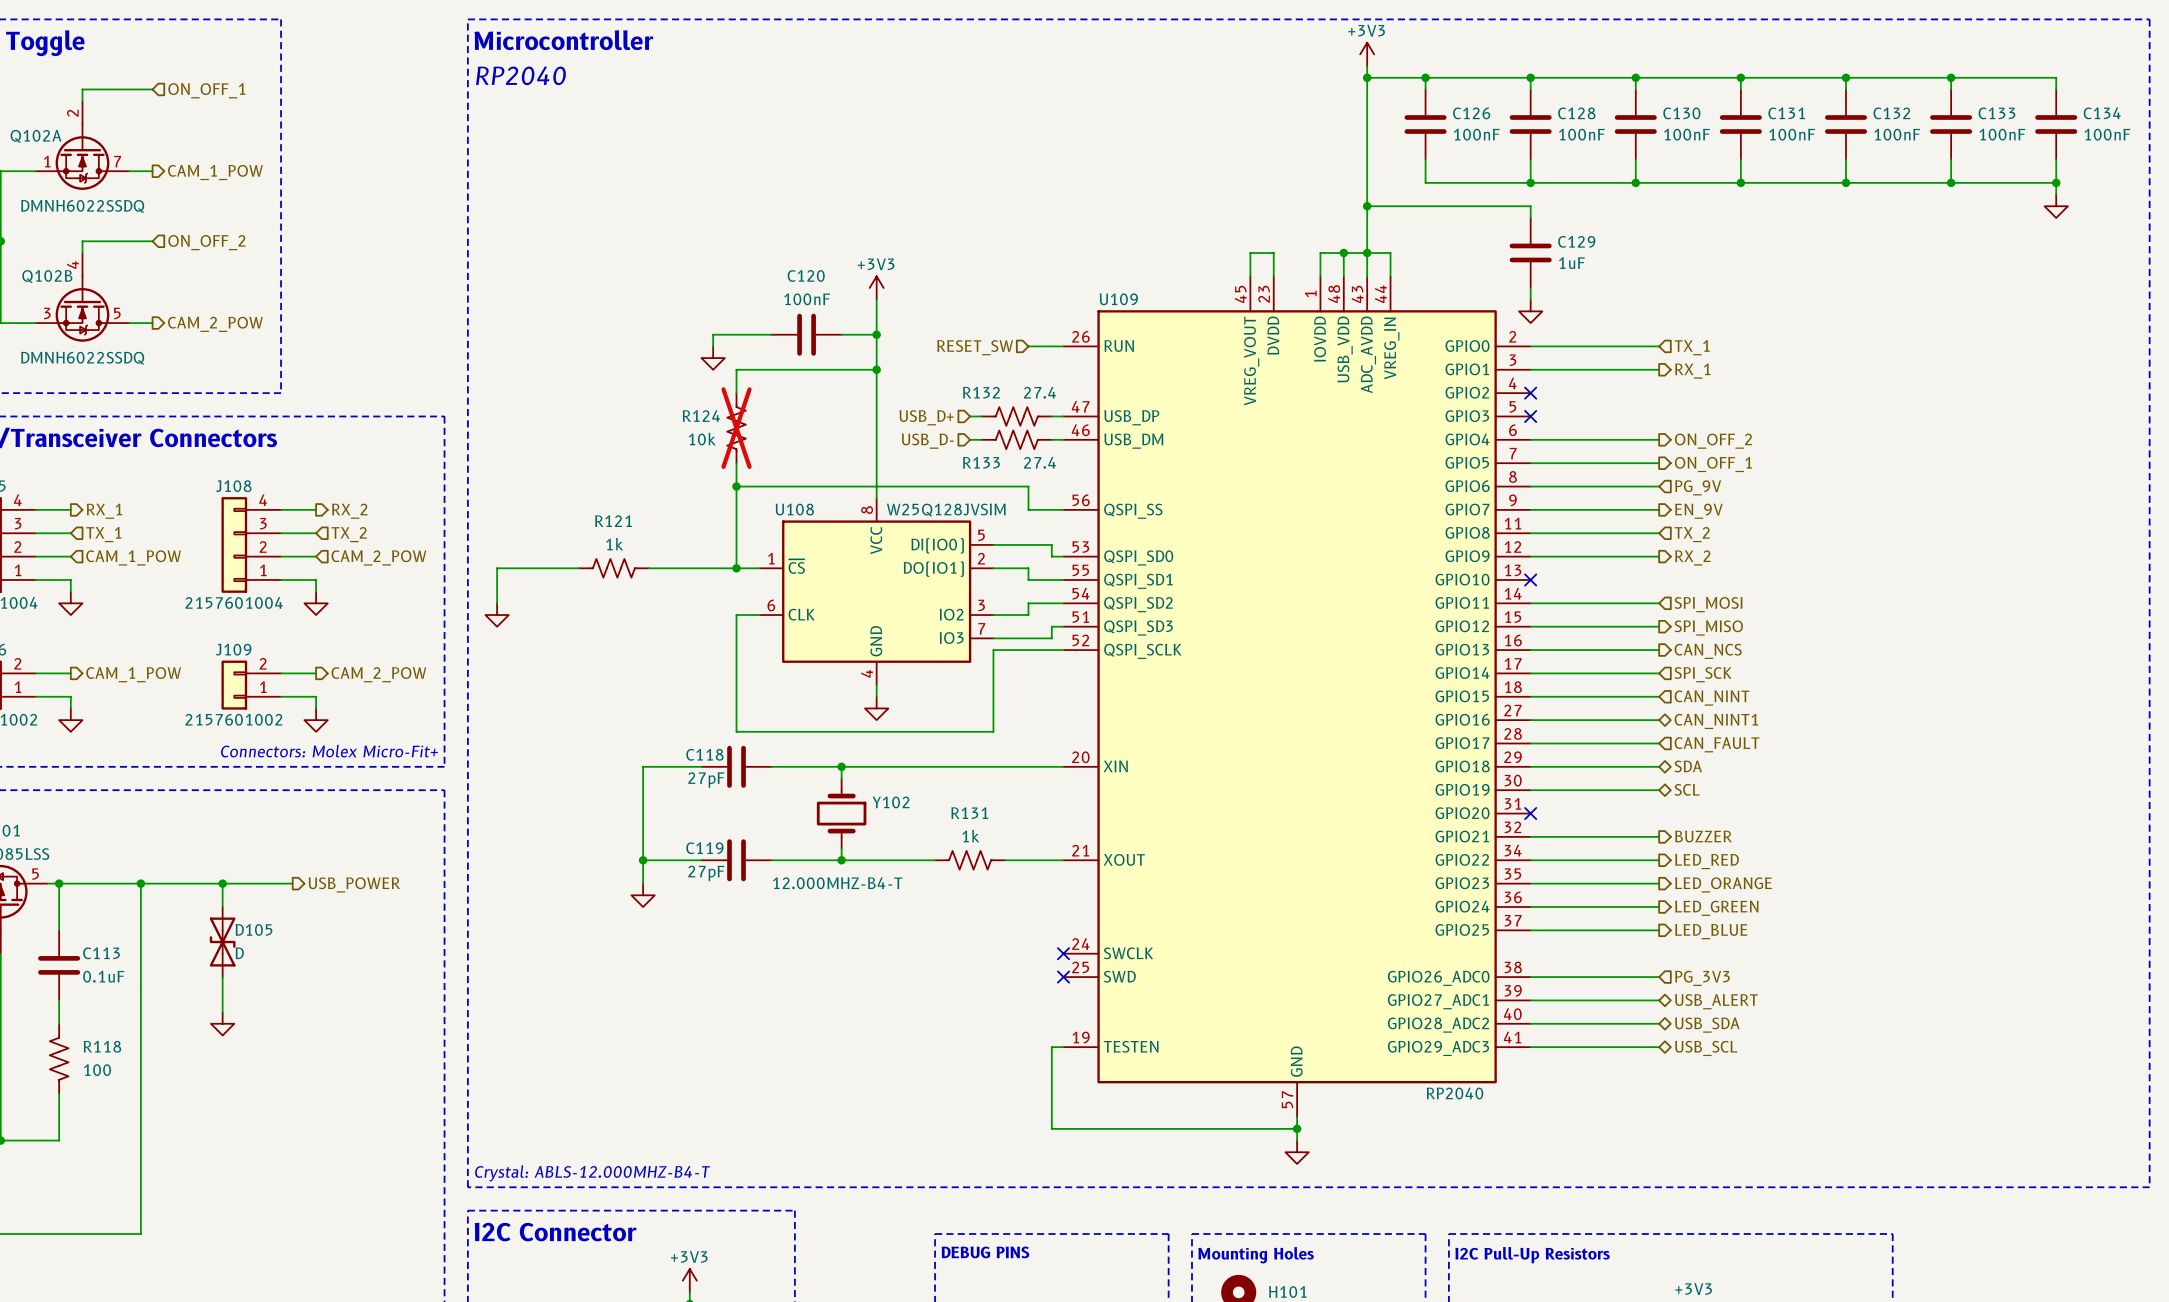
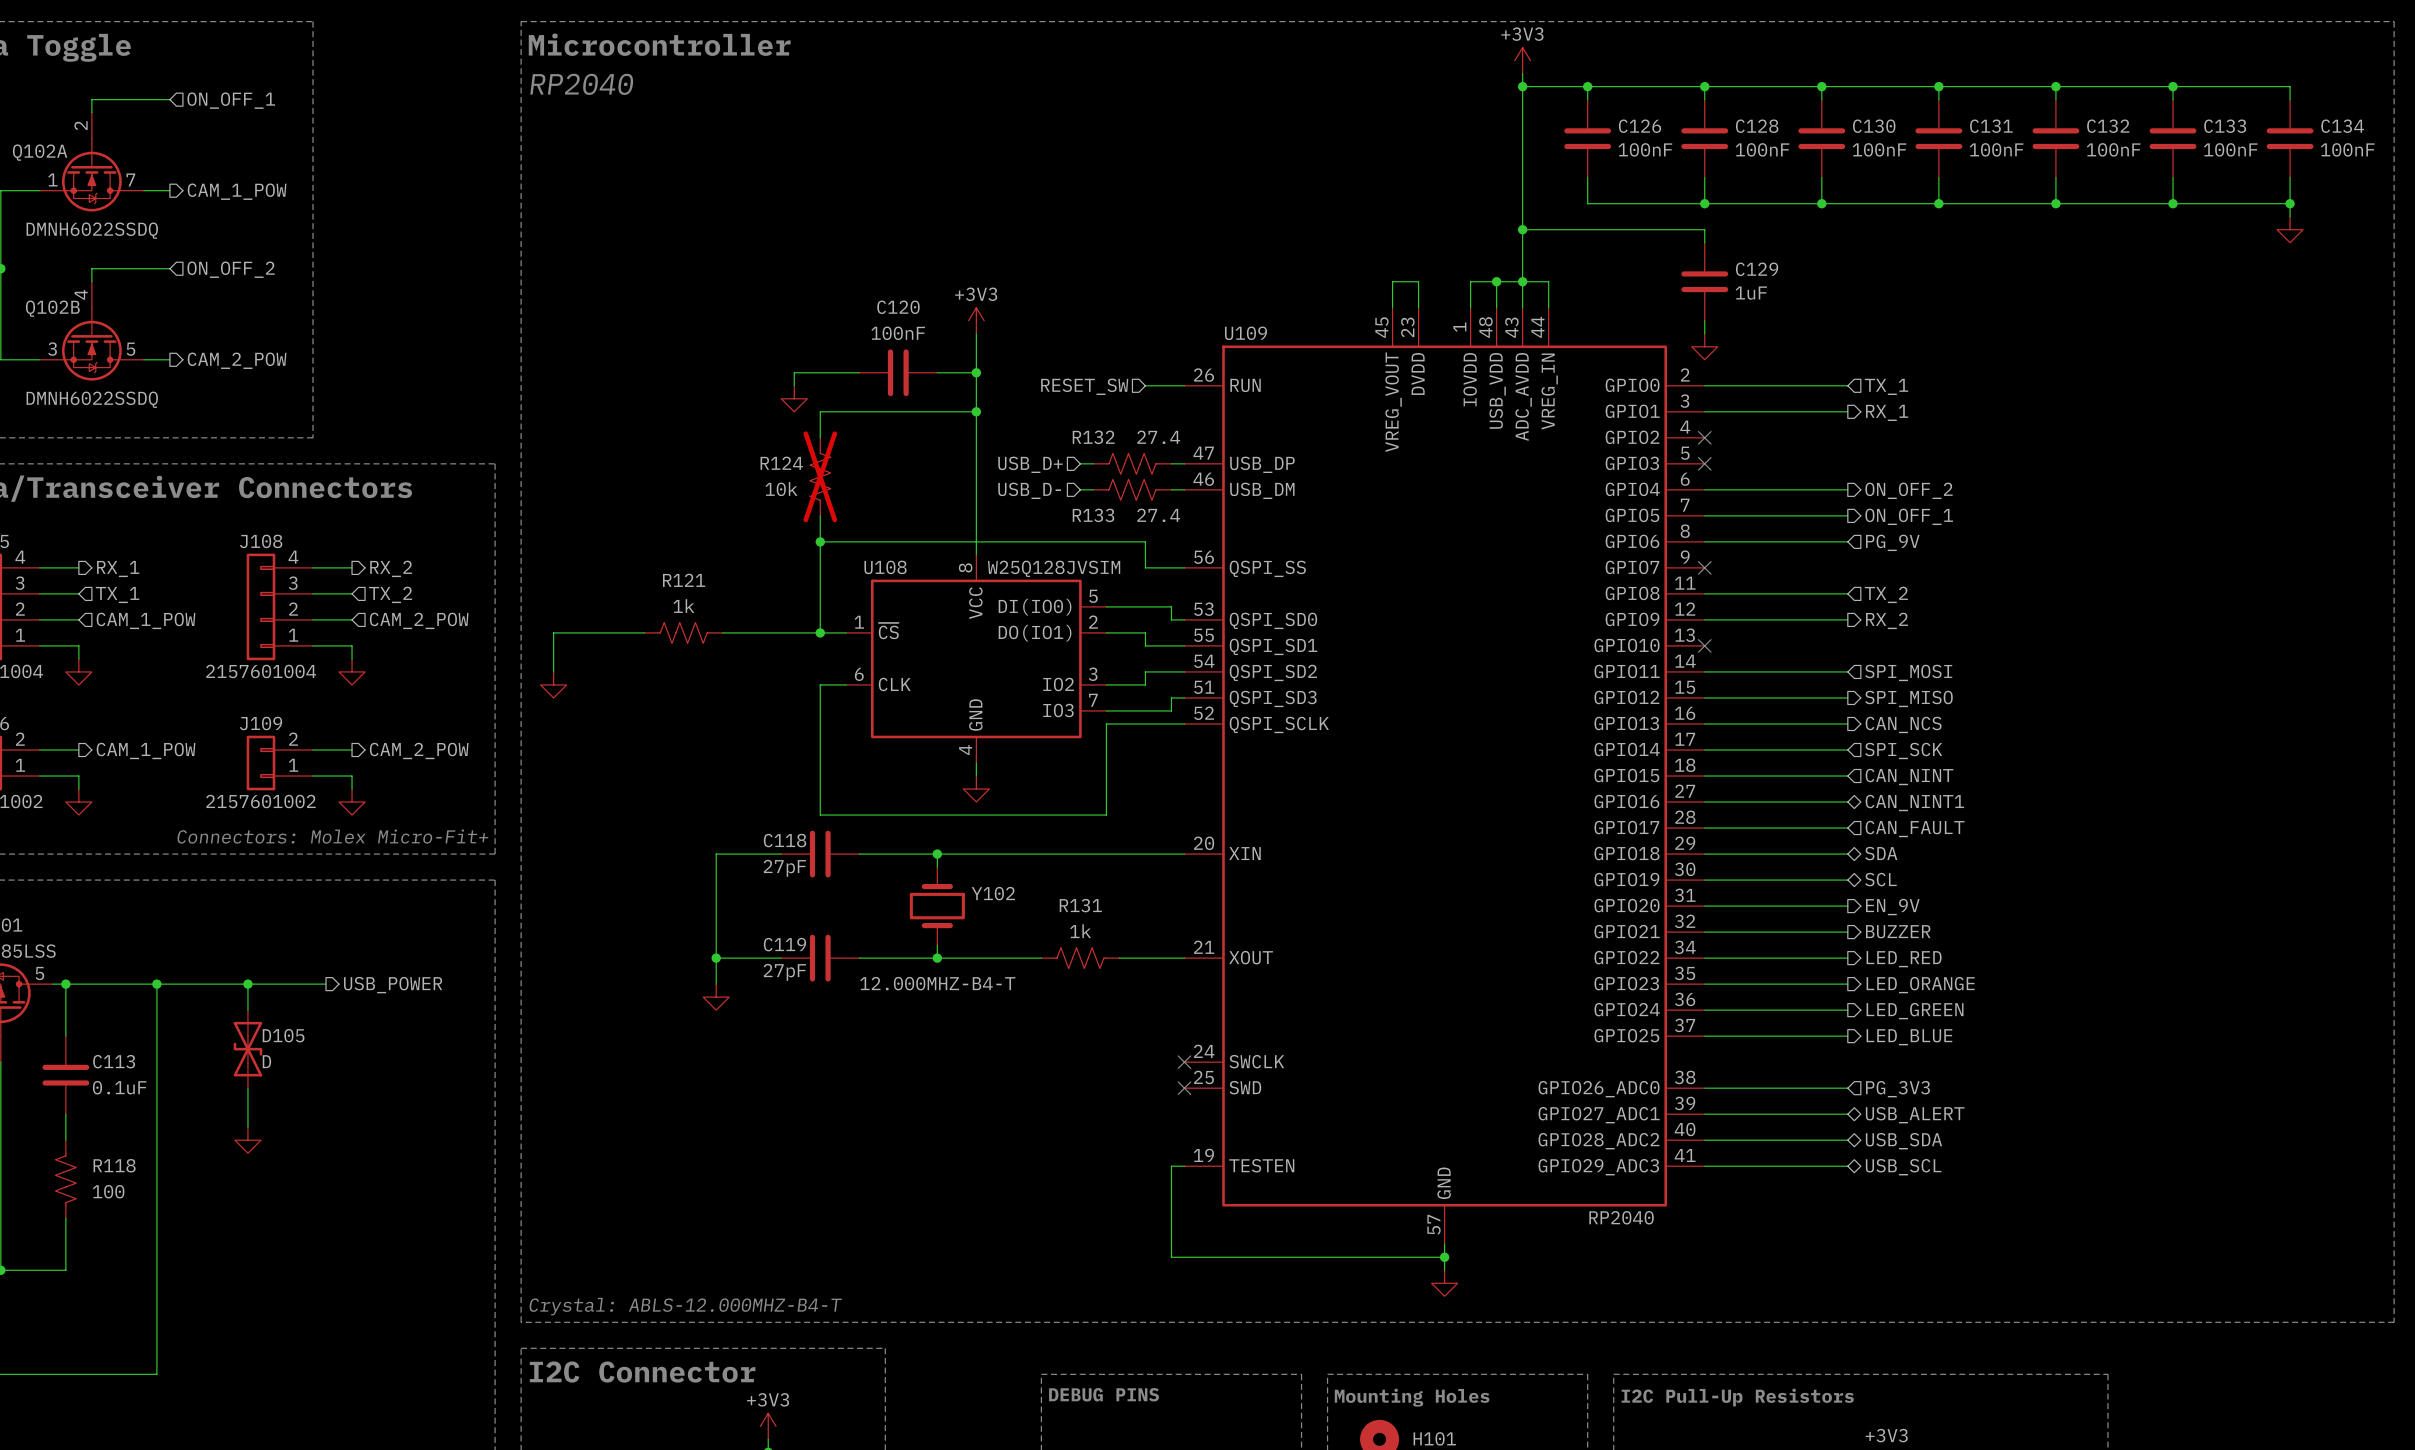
wire: (1530, 509) (1659, 509) -> none
no-connect mark: none -> (1704, 567)
hierarchical label: EN_9V (1698, 511) -> none
wire: none -> (1704, 906) (1847, 906)
no-connect mark: (1530, 813) -> none
hierarchical label: none -> EN_9V (1892, 907)

